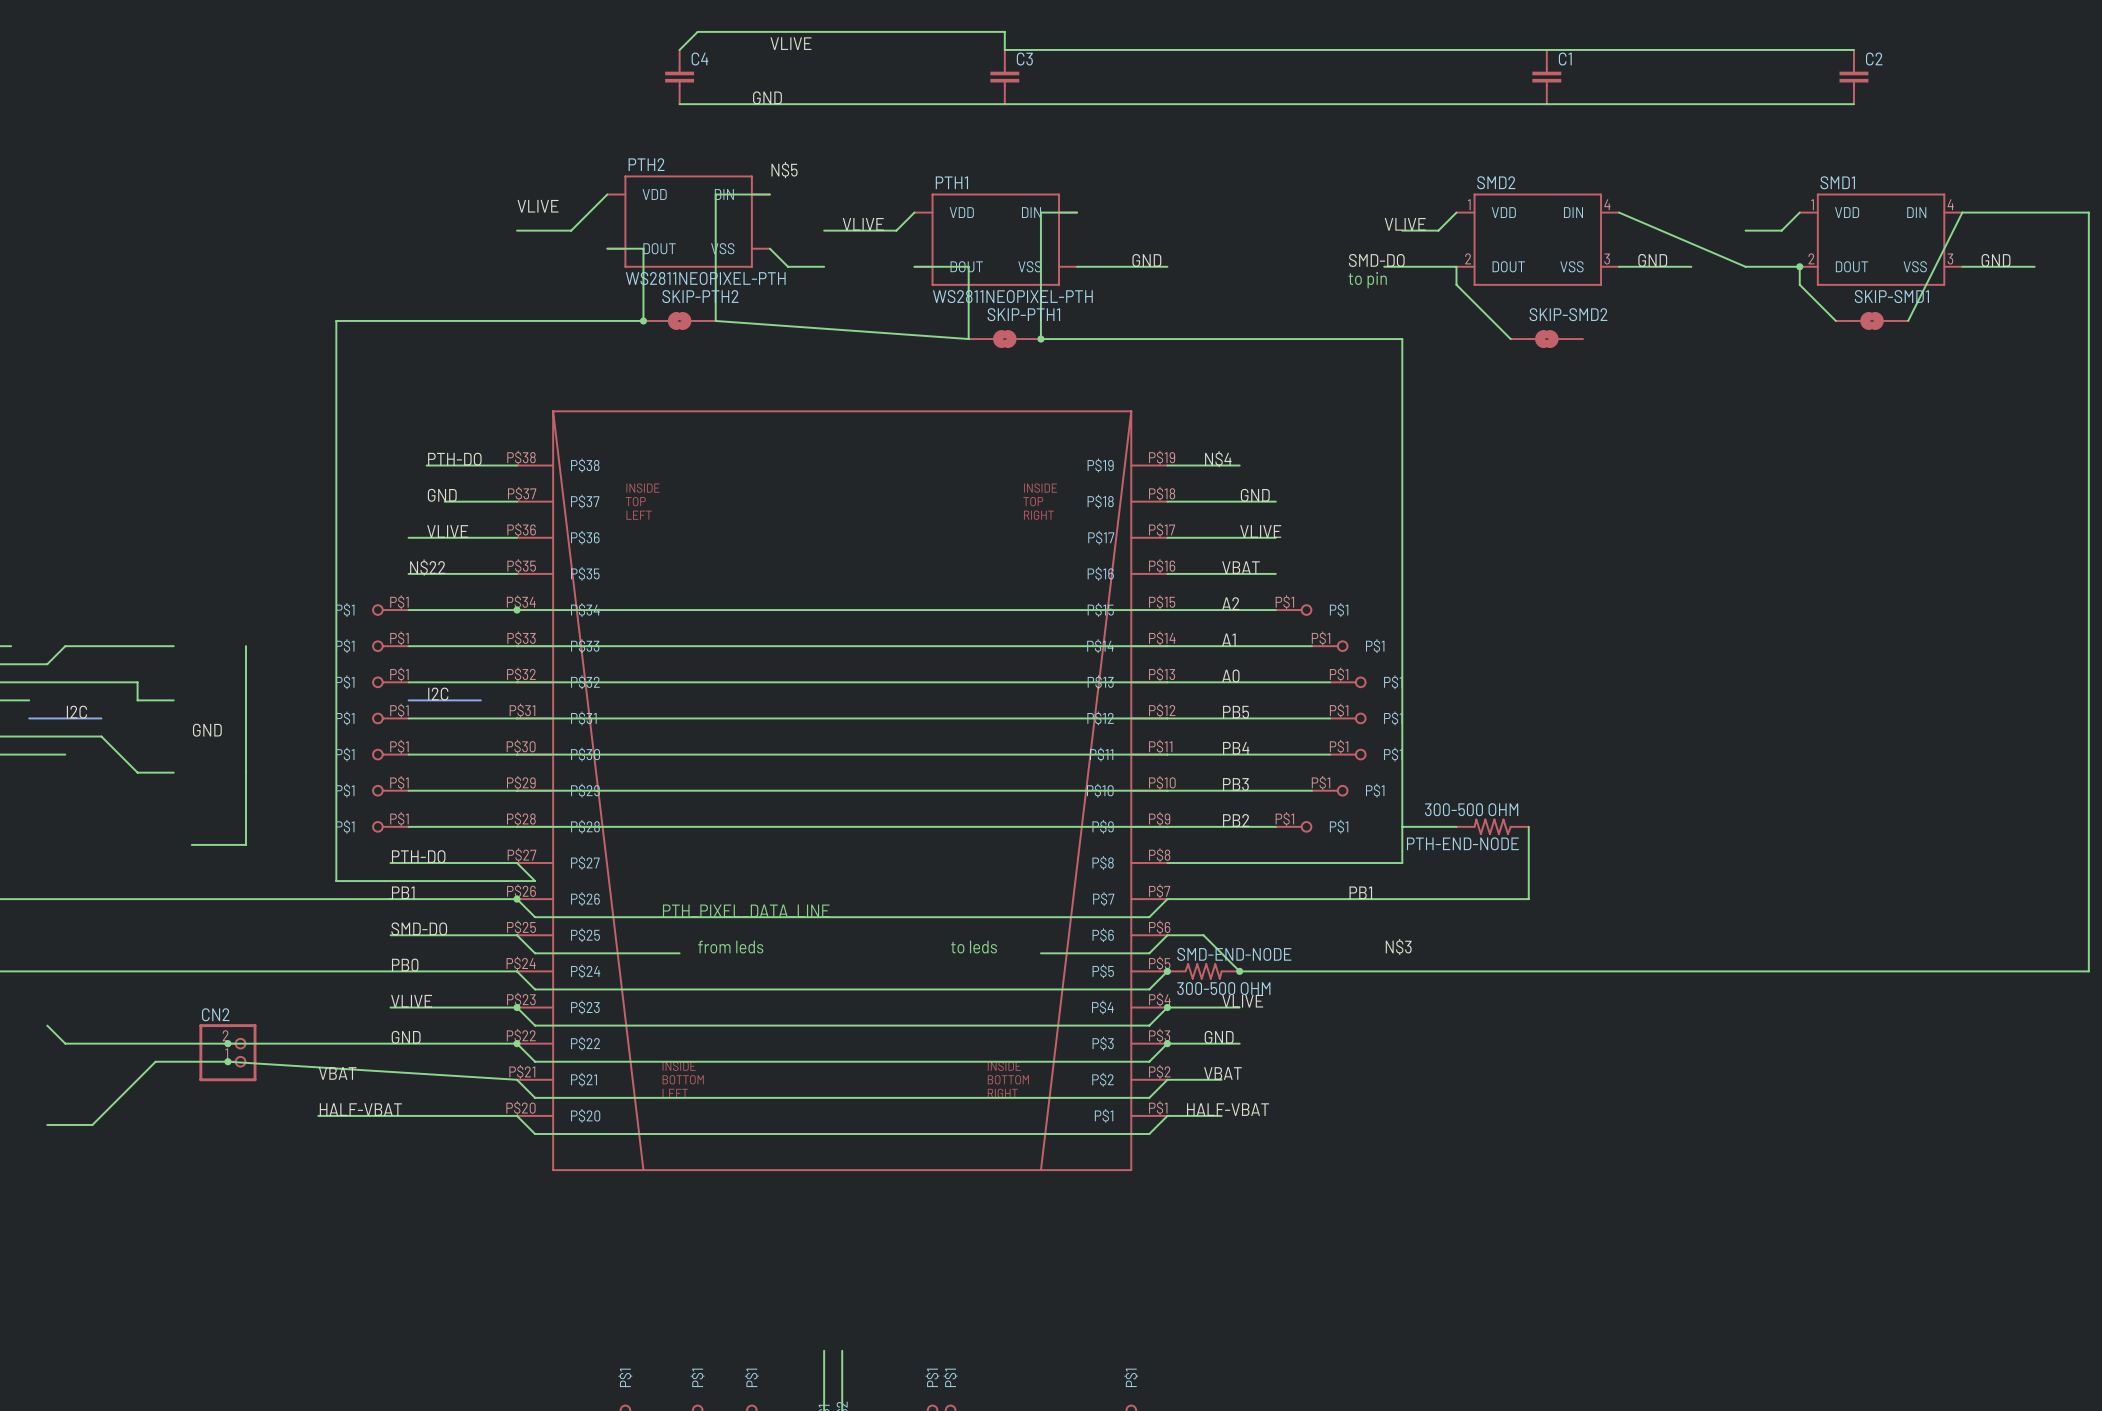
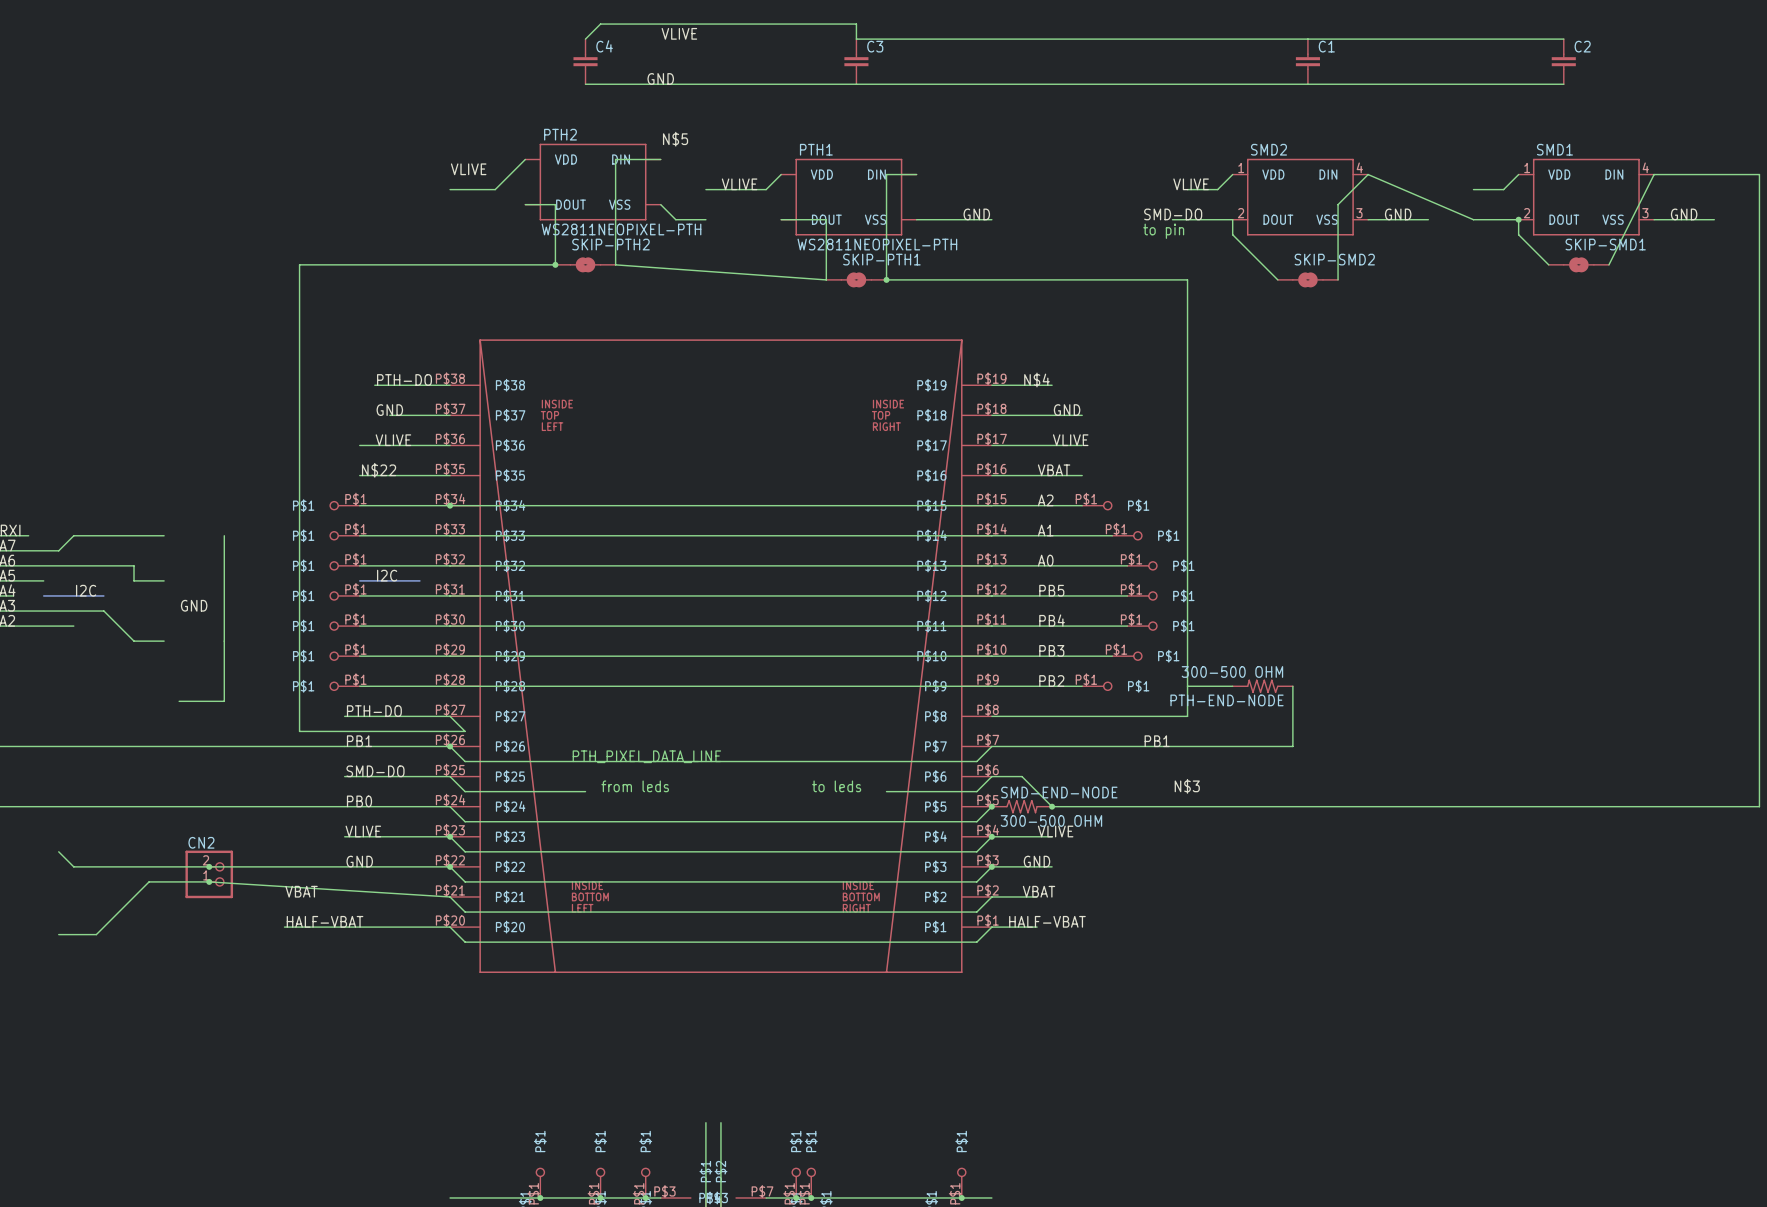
wire: none -> (1368, 174) (1338, 204) (1338, 279)

